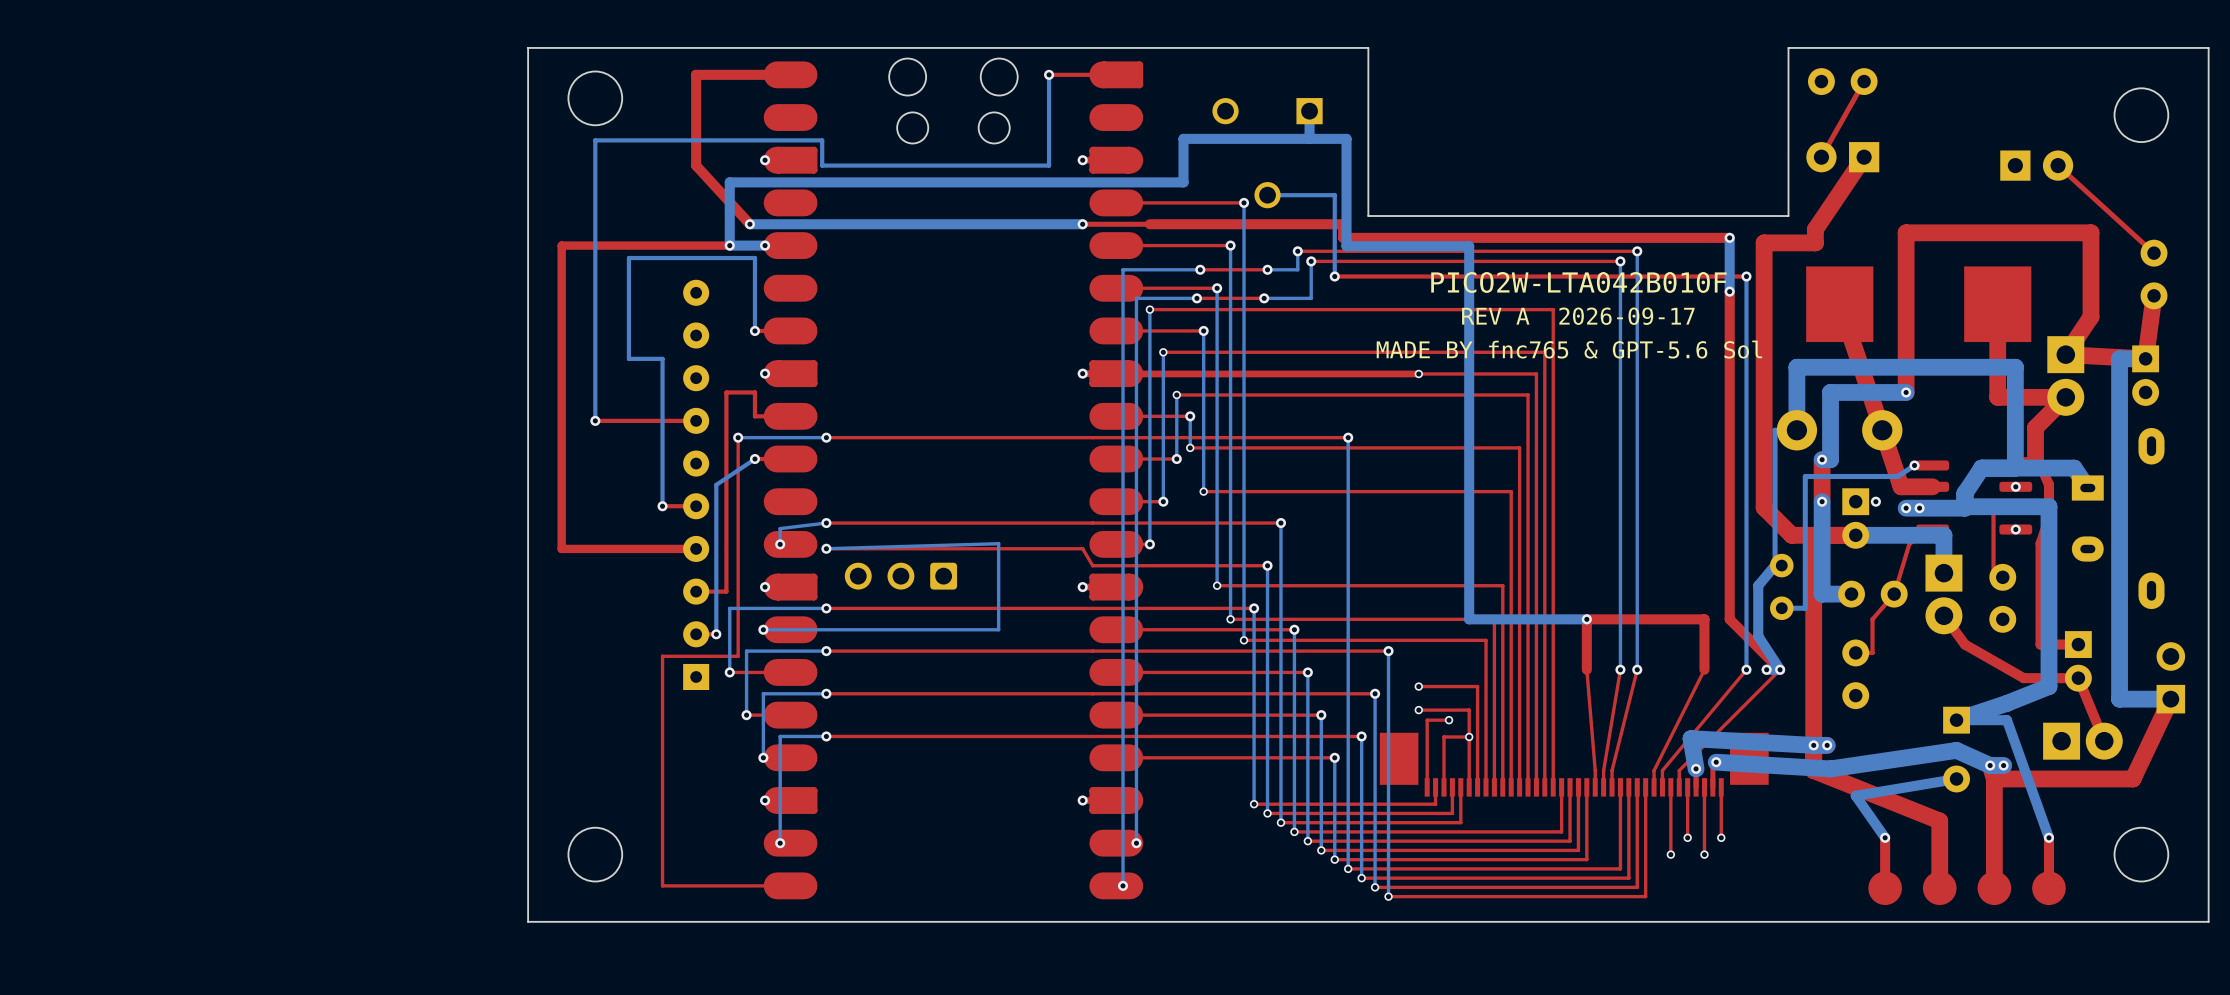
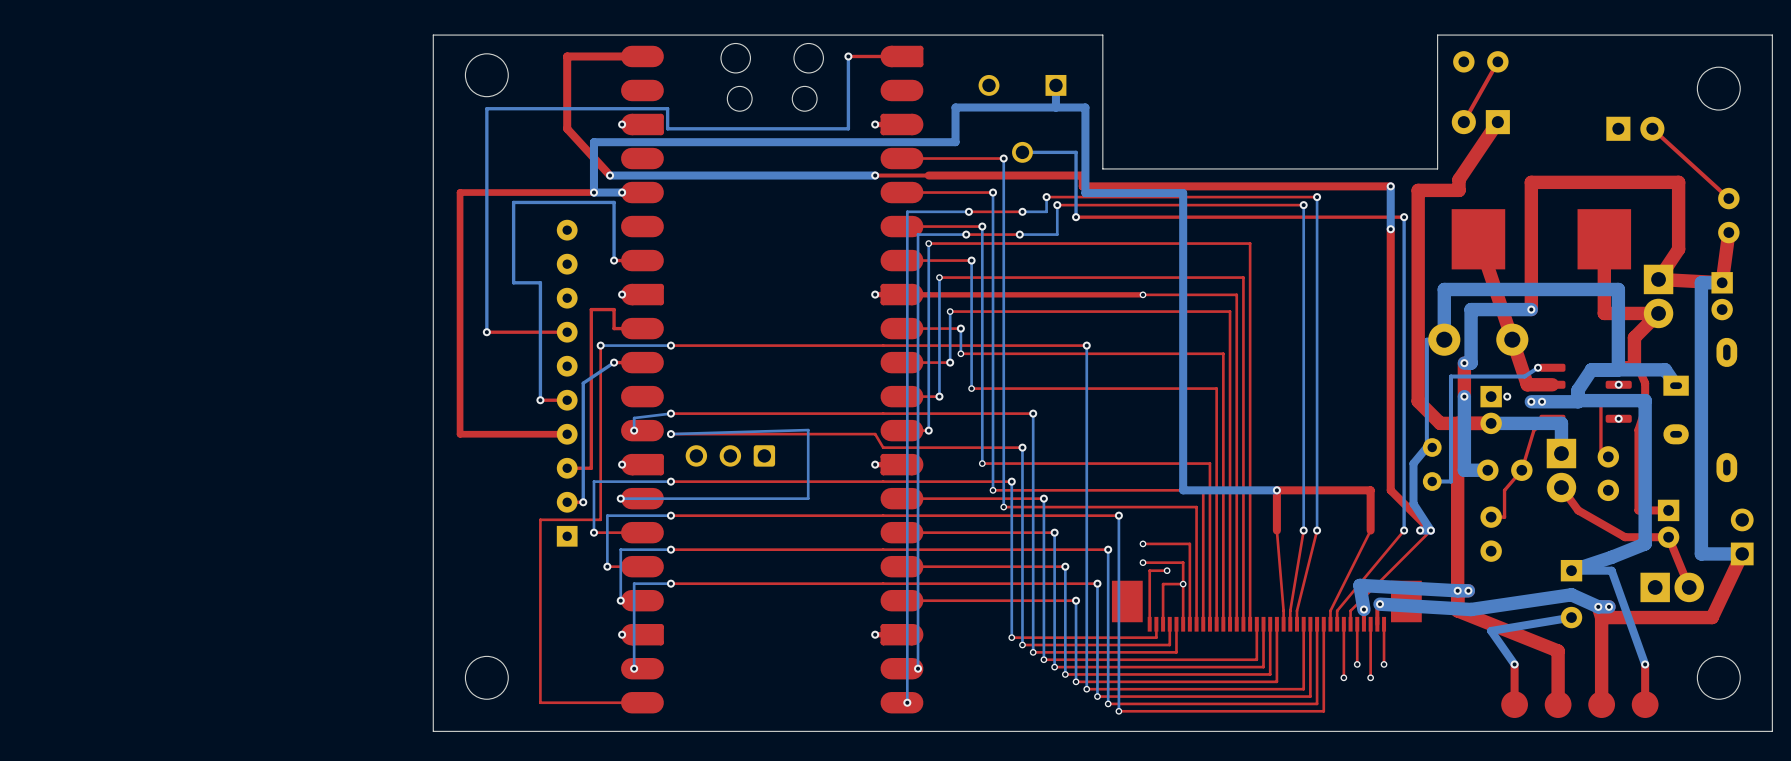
text: PICO2W-LTA042B010F (1578, 282) -> none
text: REV A 2026-09-17 (1578, 316) -> none
text: MADE BY fnc765 & GPT-5.6 Sol (1569, 349) -> none

